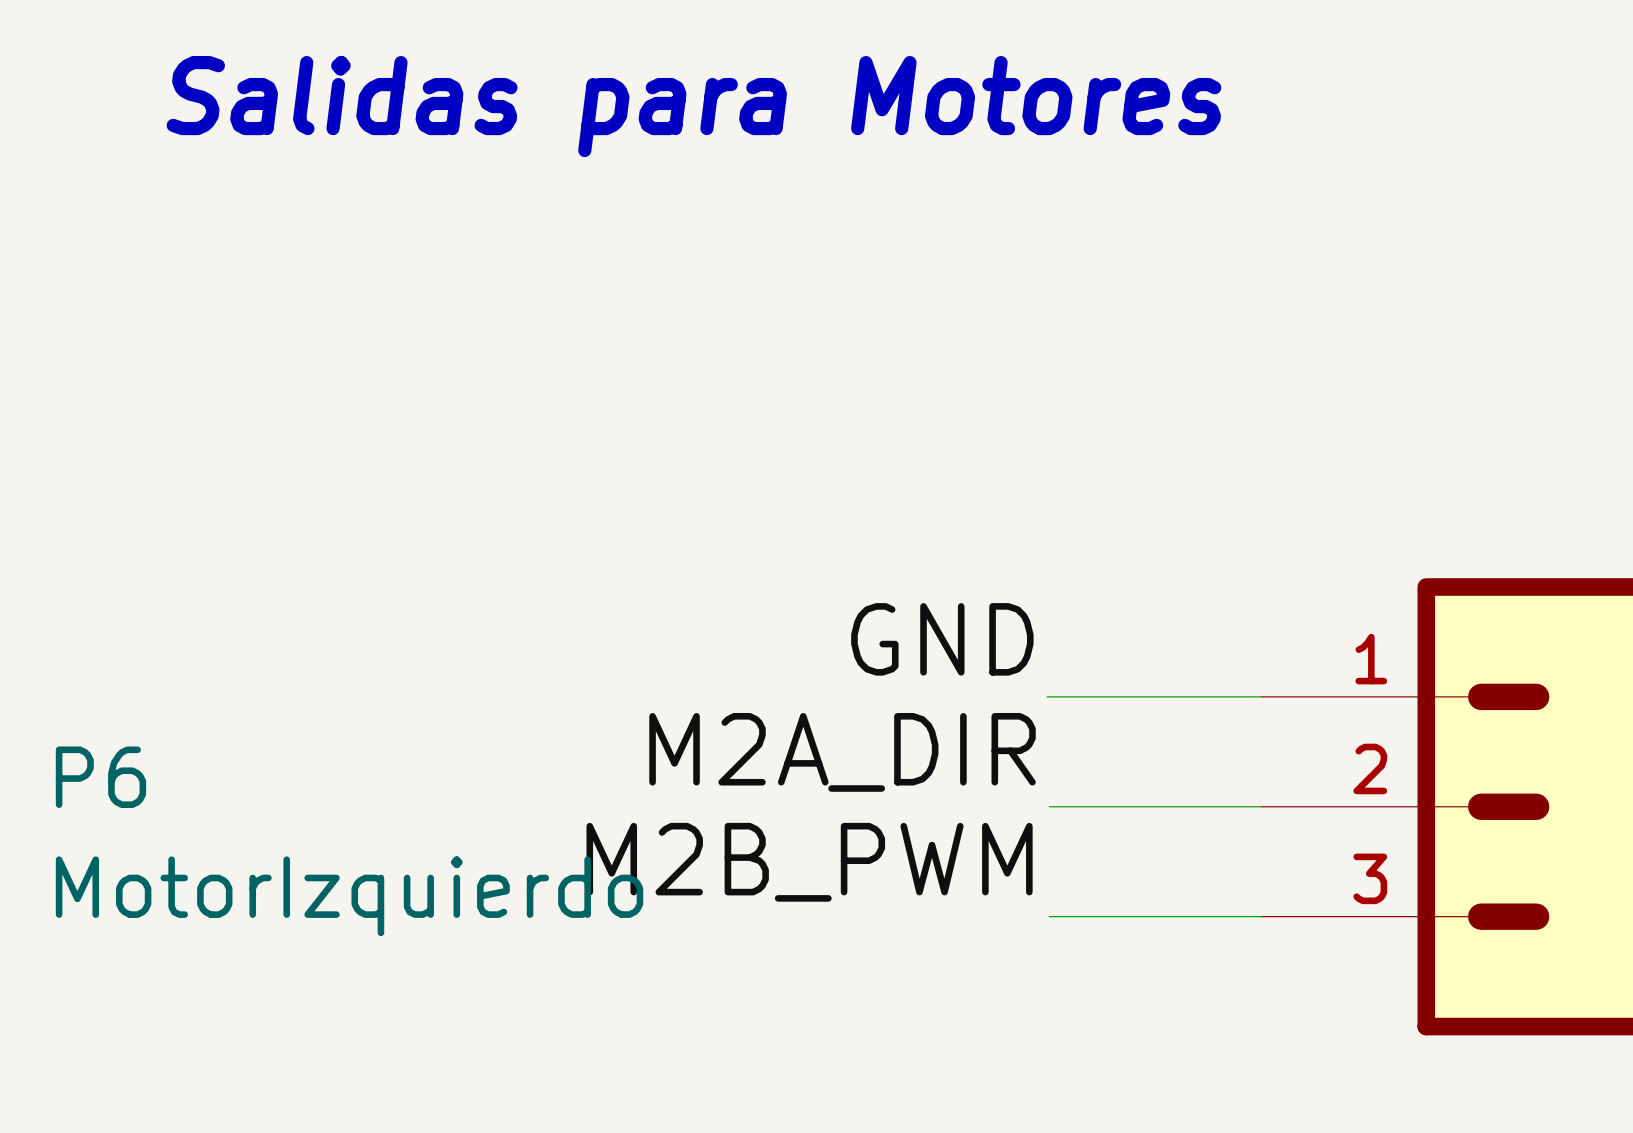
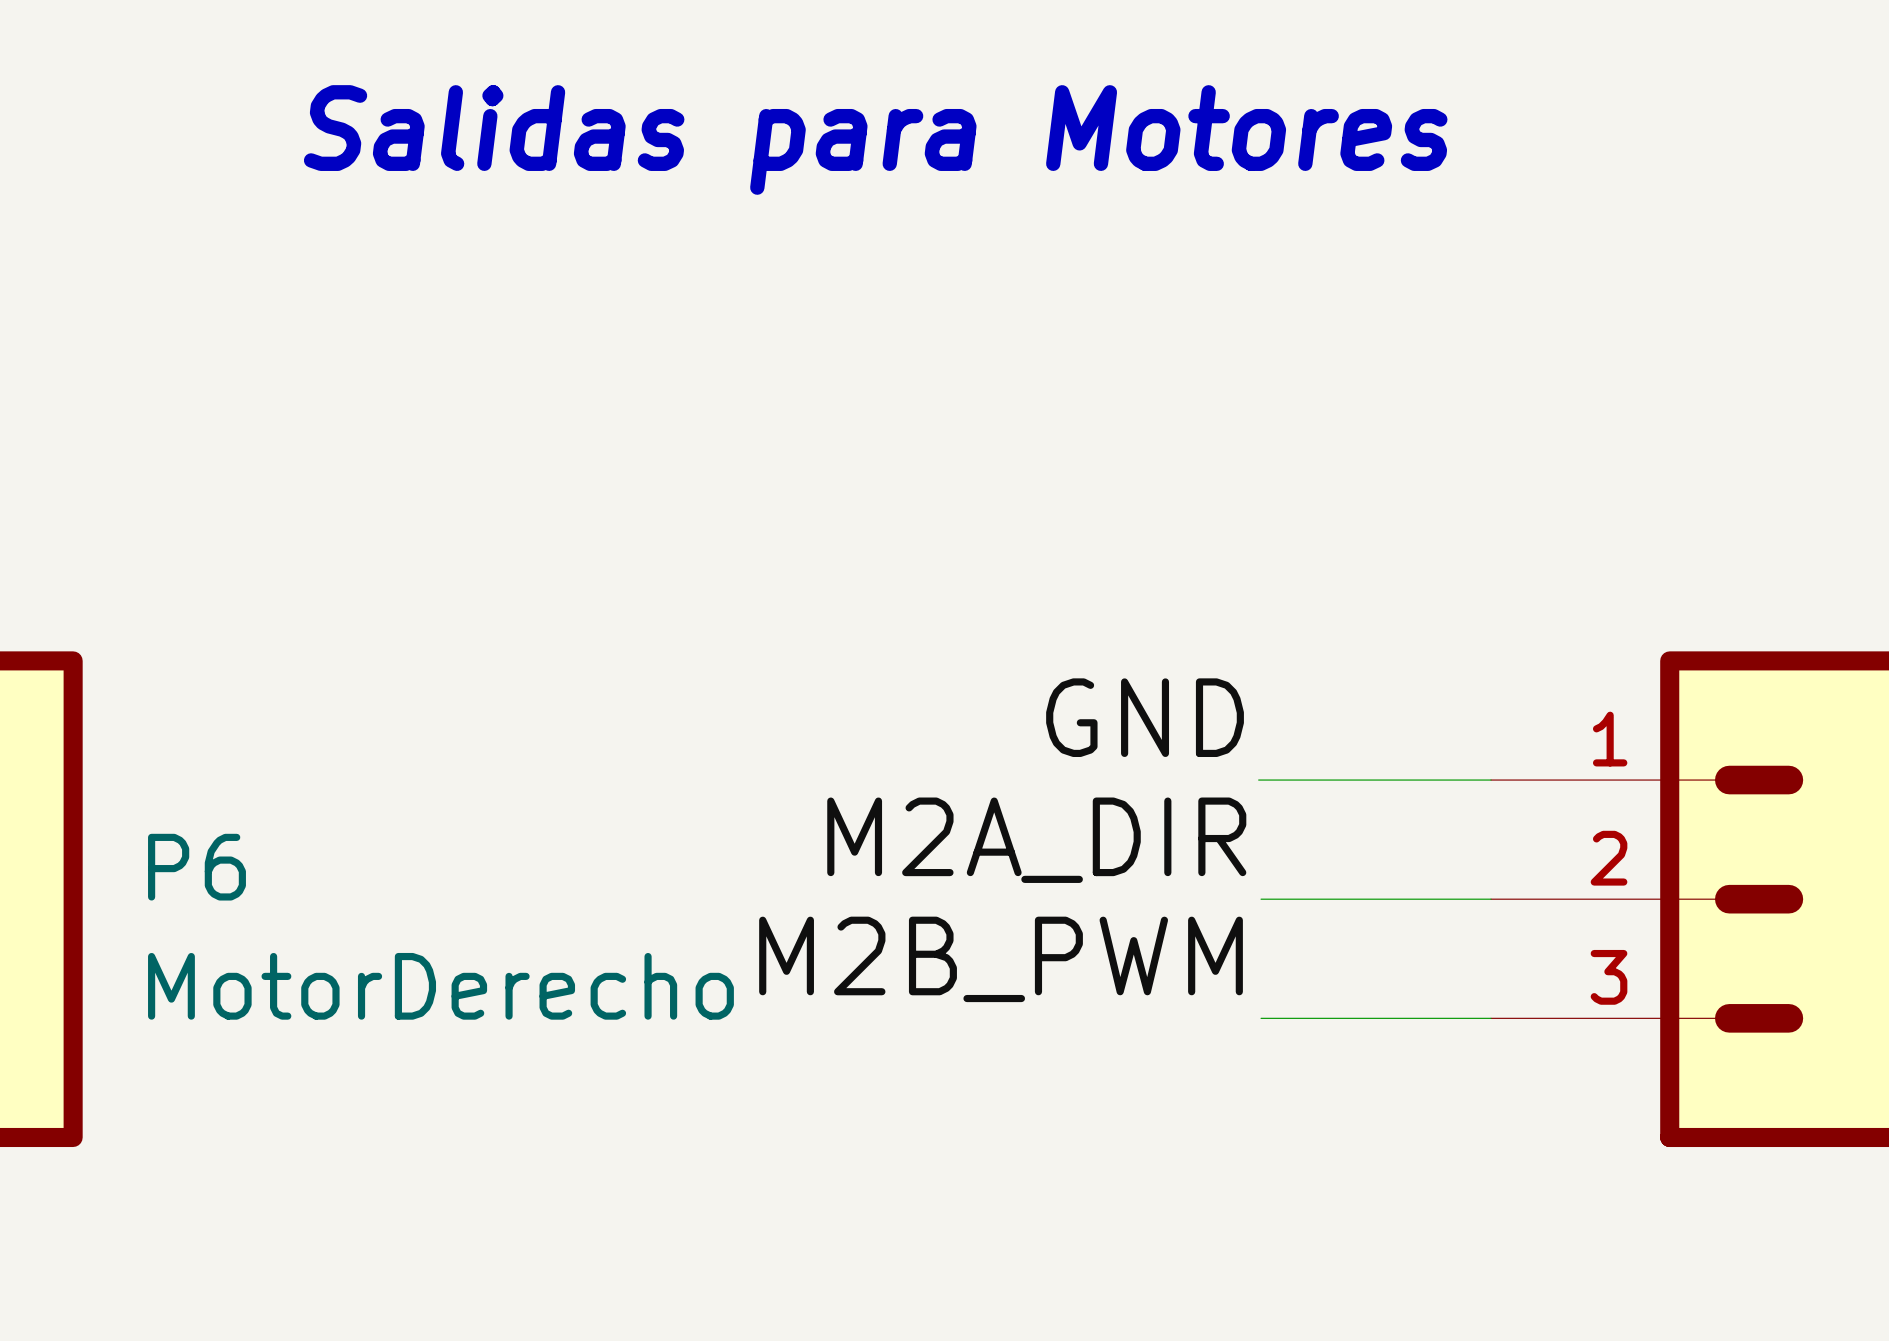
P6 name position: P6 (100, 777) -> P6 (196, 867)
P6 value: MotorIzquierdo (349, 896) -> MotorDerecho (440, 986)

